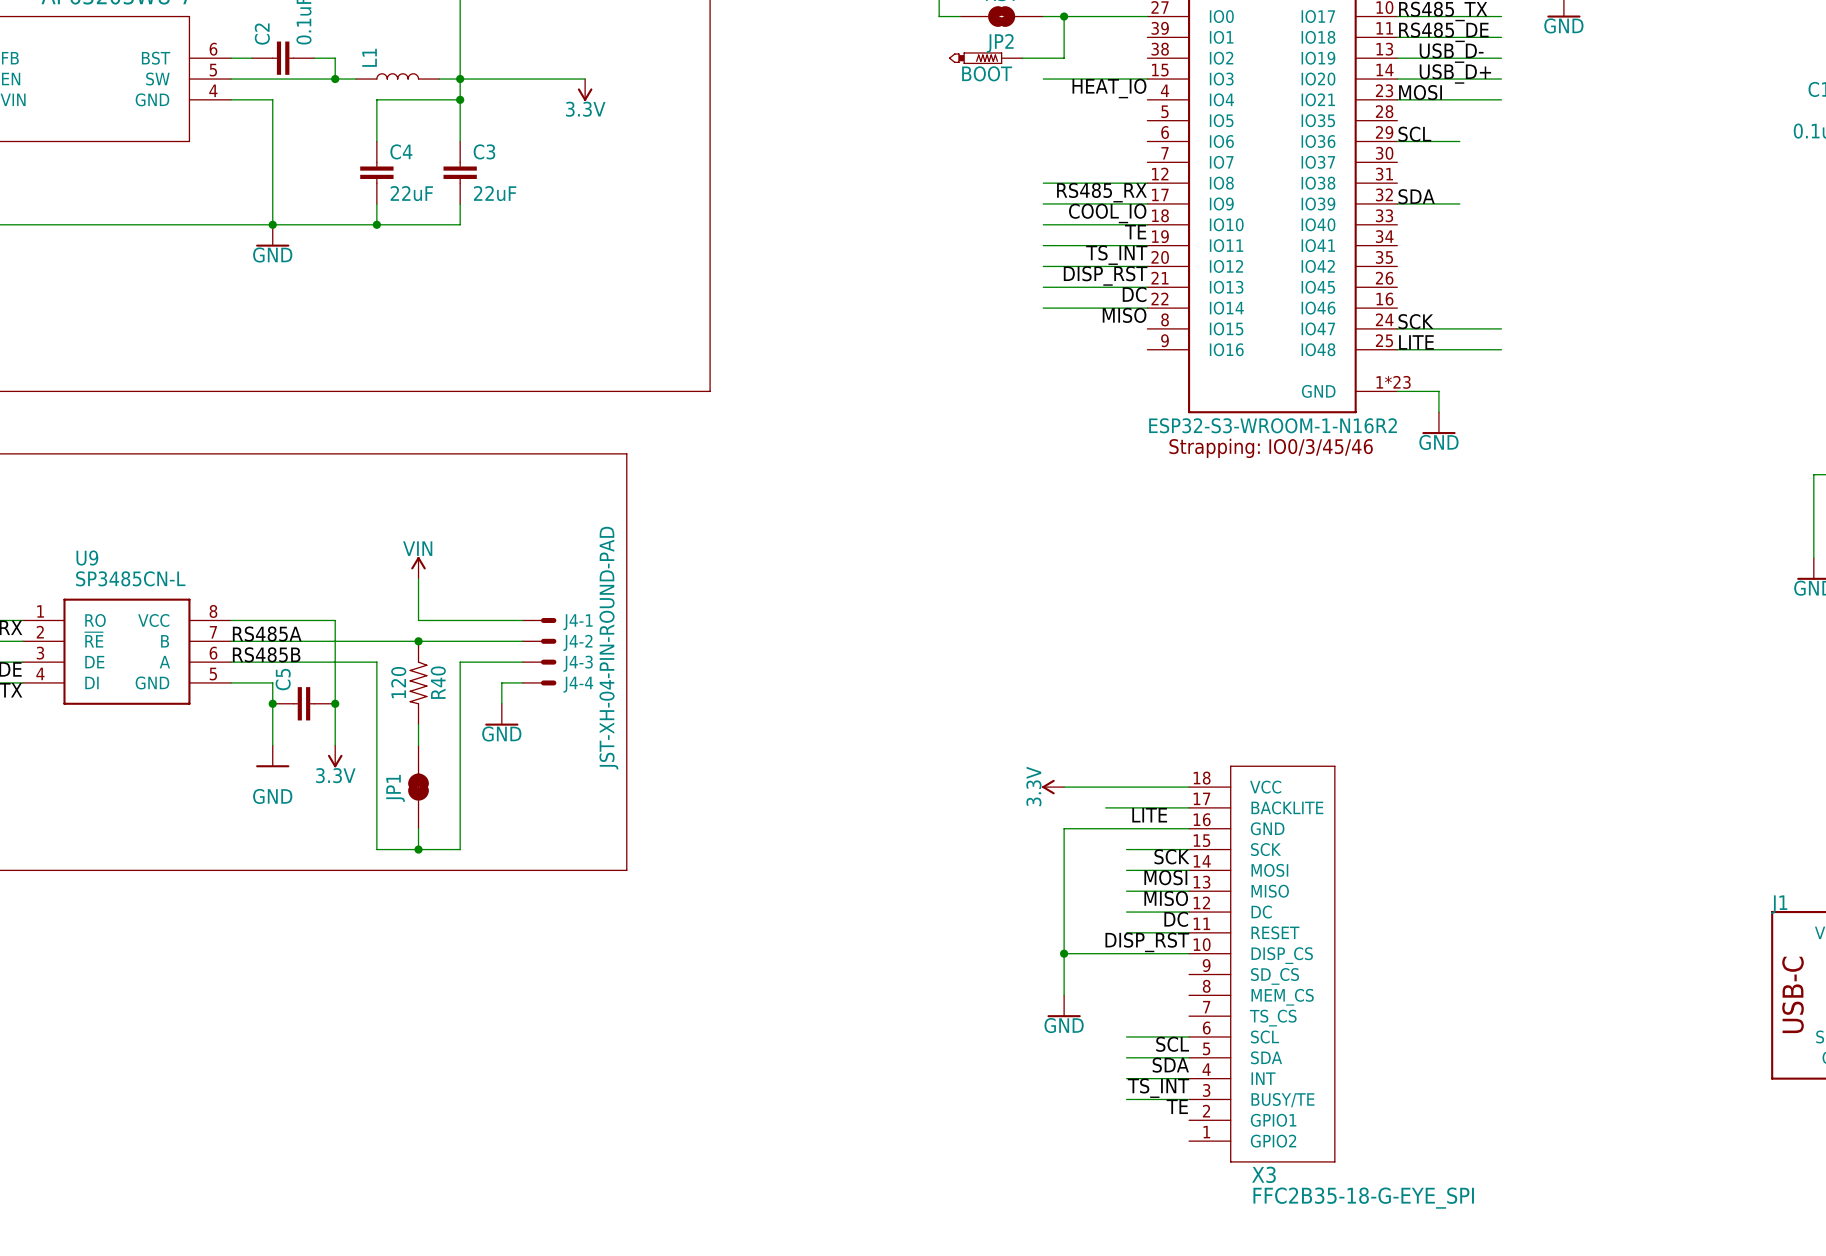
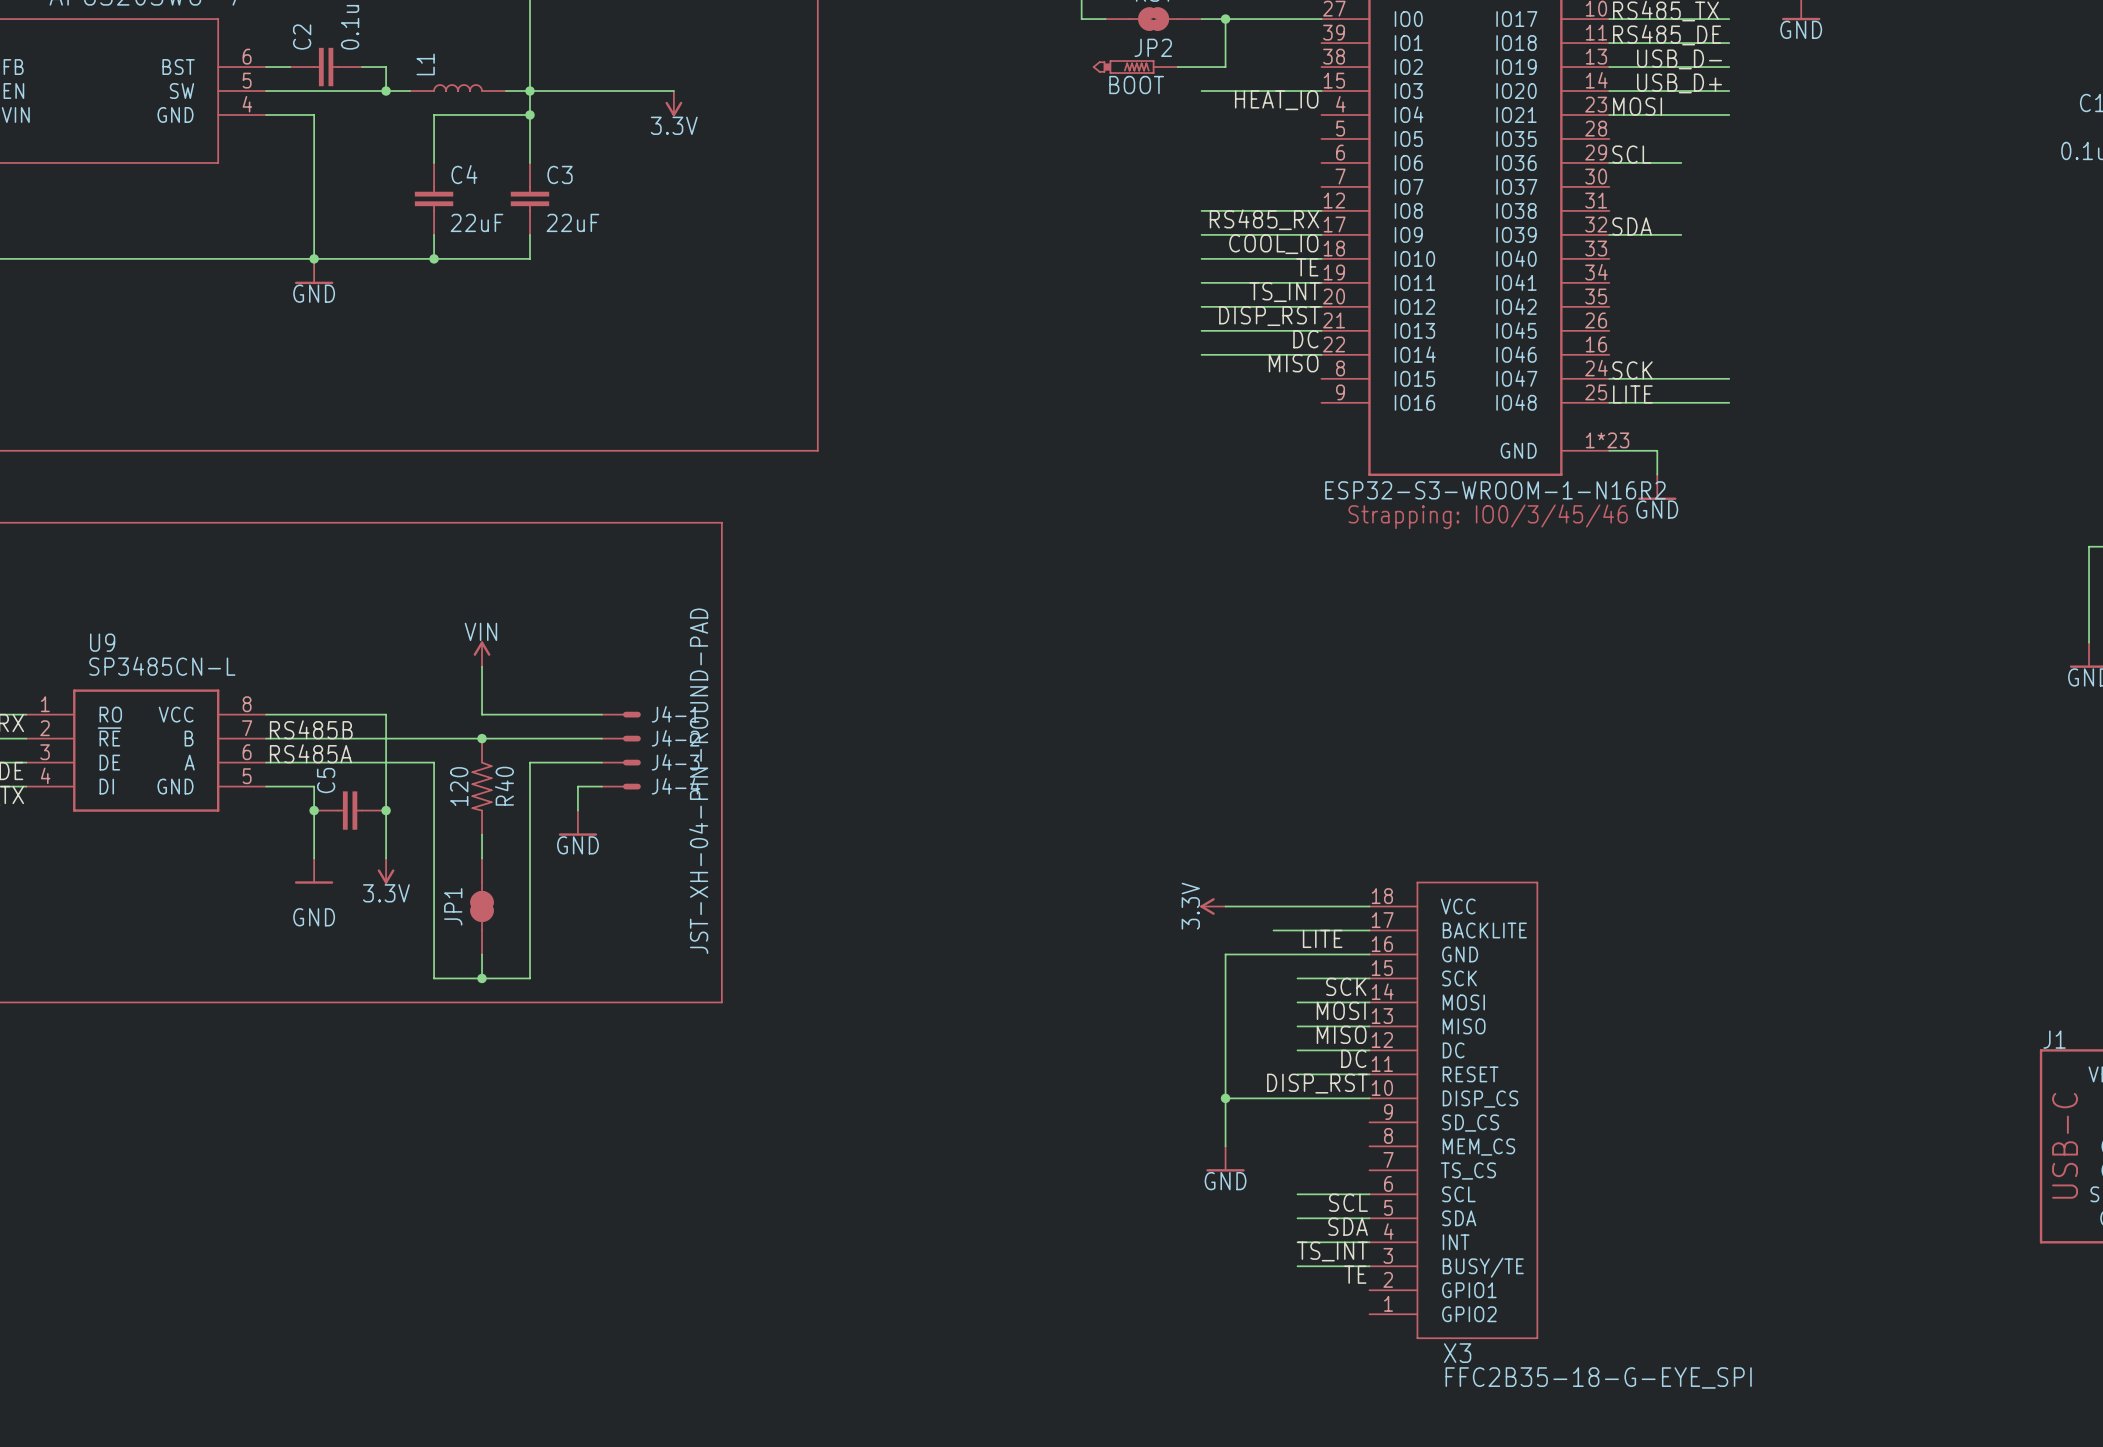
label: RS485A (267, 634) -> RS485B (311, 729)
label: RS485B (266, 654) -> RS485A (310, 753)

